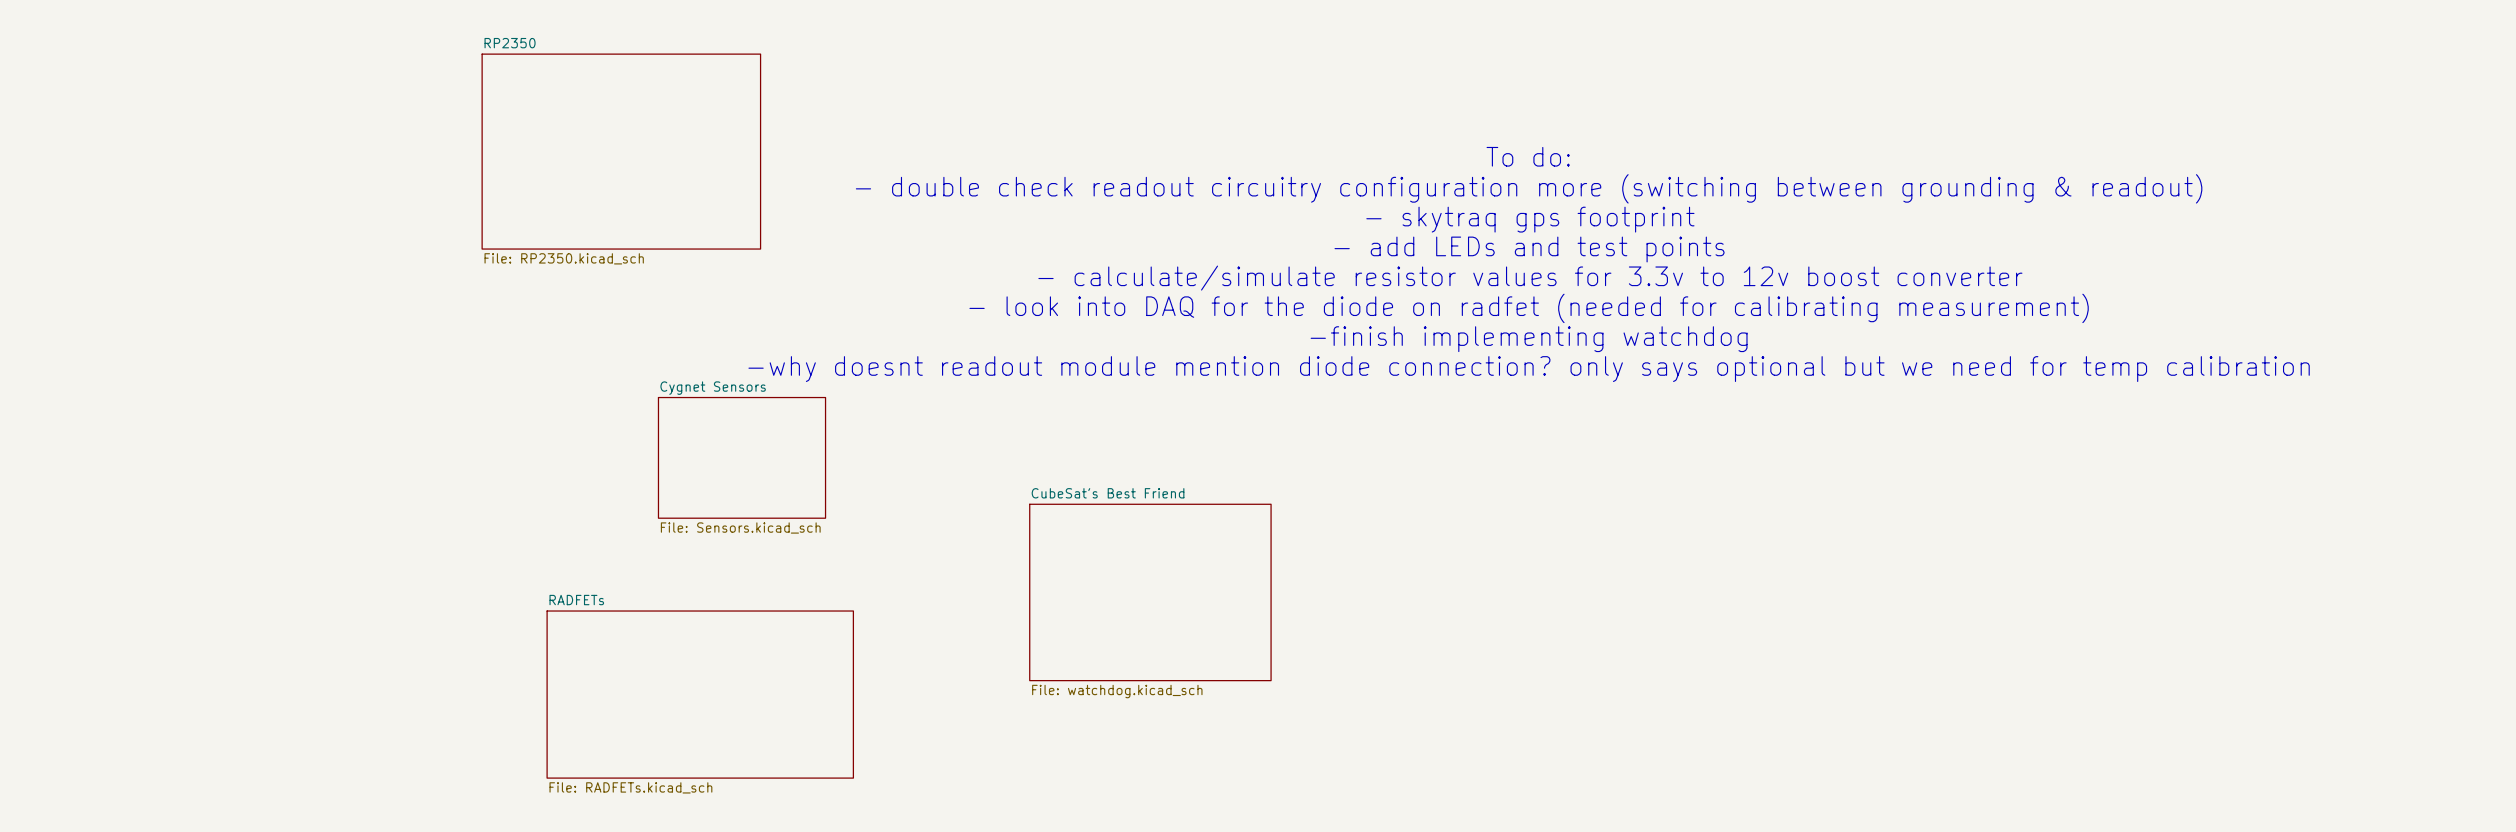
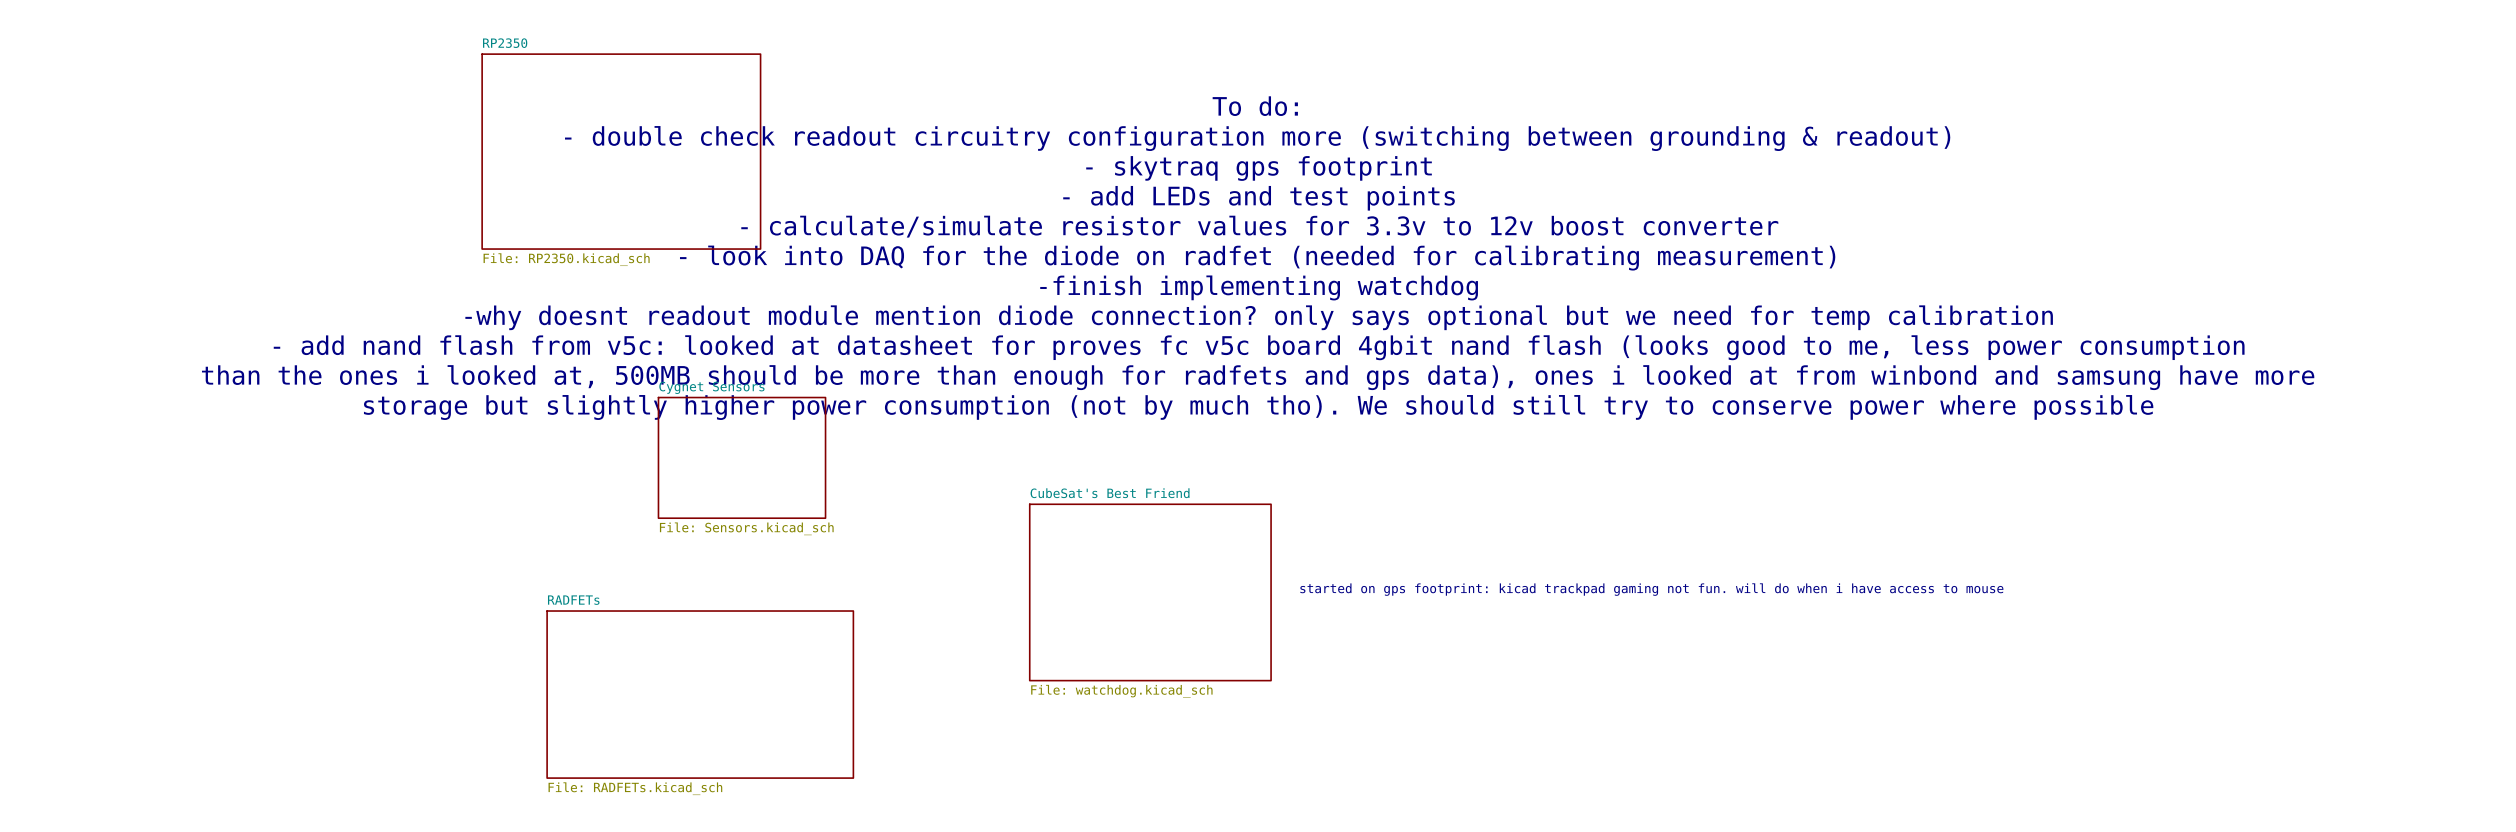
text: none -> To do: (1255, 106)
text: none -> - double check readout circuitry configuration more (switching between grounding & readout) (1257, 138)
text: To do: (1528, 156) -> none
text: none -> - skytraq gps footprint (1259, 168)
text: - double check readout circuitry configuration more (switching between grounding & readout) (1529, 188) -> none
text: none -> - add LEDs and test points (1259, 198)
text: - skytraq gps footprint (1530, 219) -> none
text: none -> - calculate/simulate resistor values for 3.3v to 12v boost converter (1259, 226)
text: - add LEDs and test points (1529, 249) -> none
text: none -> - look into DAQ for the diode on radfet (needed for calibrating measurement) (1257, 258)
text: - calculate/simulate resistor values for 3.3v to 12v boost converter (1530, 278) -> none
text: none -> -finish implementing watchdog (1259, 287)
text: - look into DAQ for the diode on radfet (needed for calibrating measurement) (1529, 308) -> none
text: none -> -why doesnt readout module mention diode connection? only says optional but we need for temp calibration (1259, 317)
text: -finish implementing watchdog (1529, 339) -> none
text: none -> - add nand flash from v5c: looked at datasheet for proves fc v5c board 4gbit nand flash (looks good to me, less power consumption (1259, 347)
text: -why doesnt readout module mention diode connection? only says optional but we need for temp calibration (1529, 369) -> none
text: none -> than the ones i looked at, 500MB should be more than enough for radfets and gps data), ones i looked at from winbond and samsung have more (1258, 377)
text: none -> storage but slightly higher power consumption (not by much tho). We should still try to conserve power where possible (1258, 407)
text: none -> started on gps footprint: kicad trackpad gaming not fun. will do when i have access to mouse (1651, 589)

